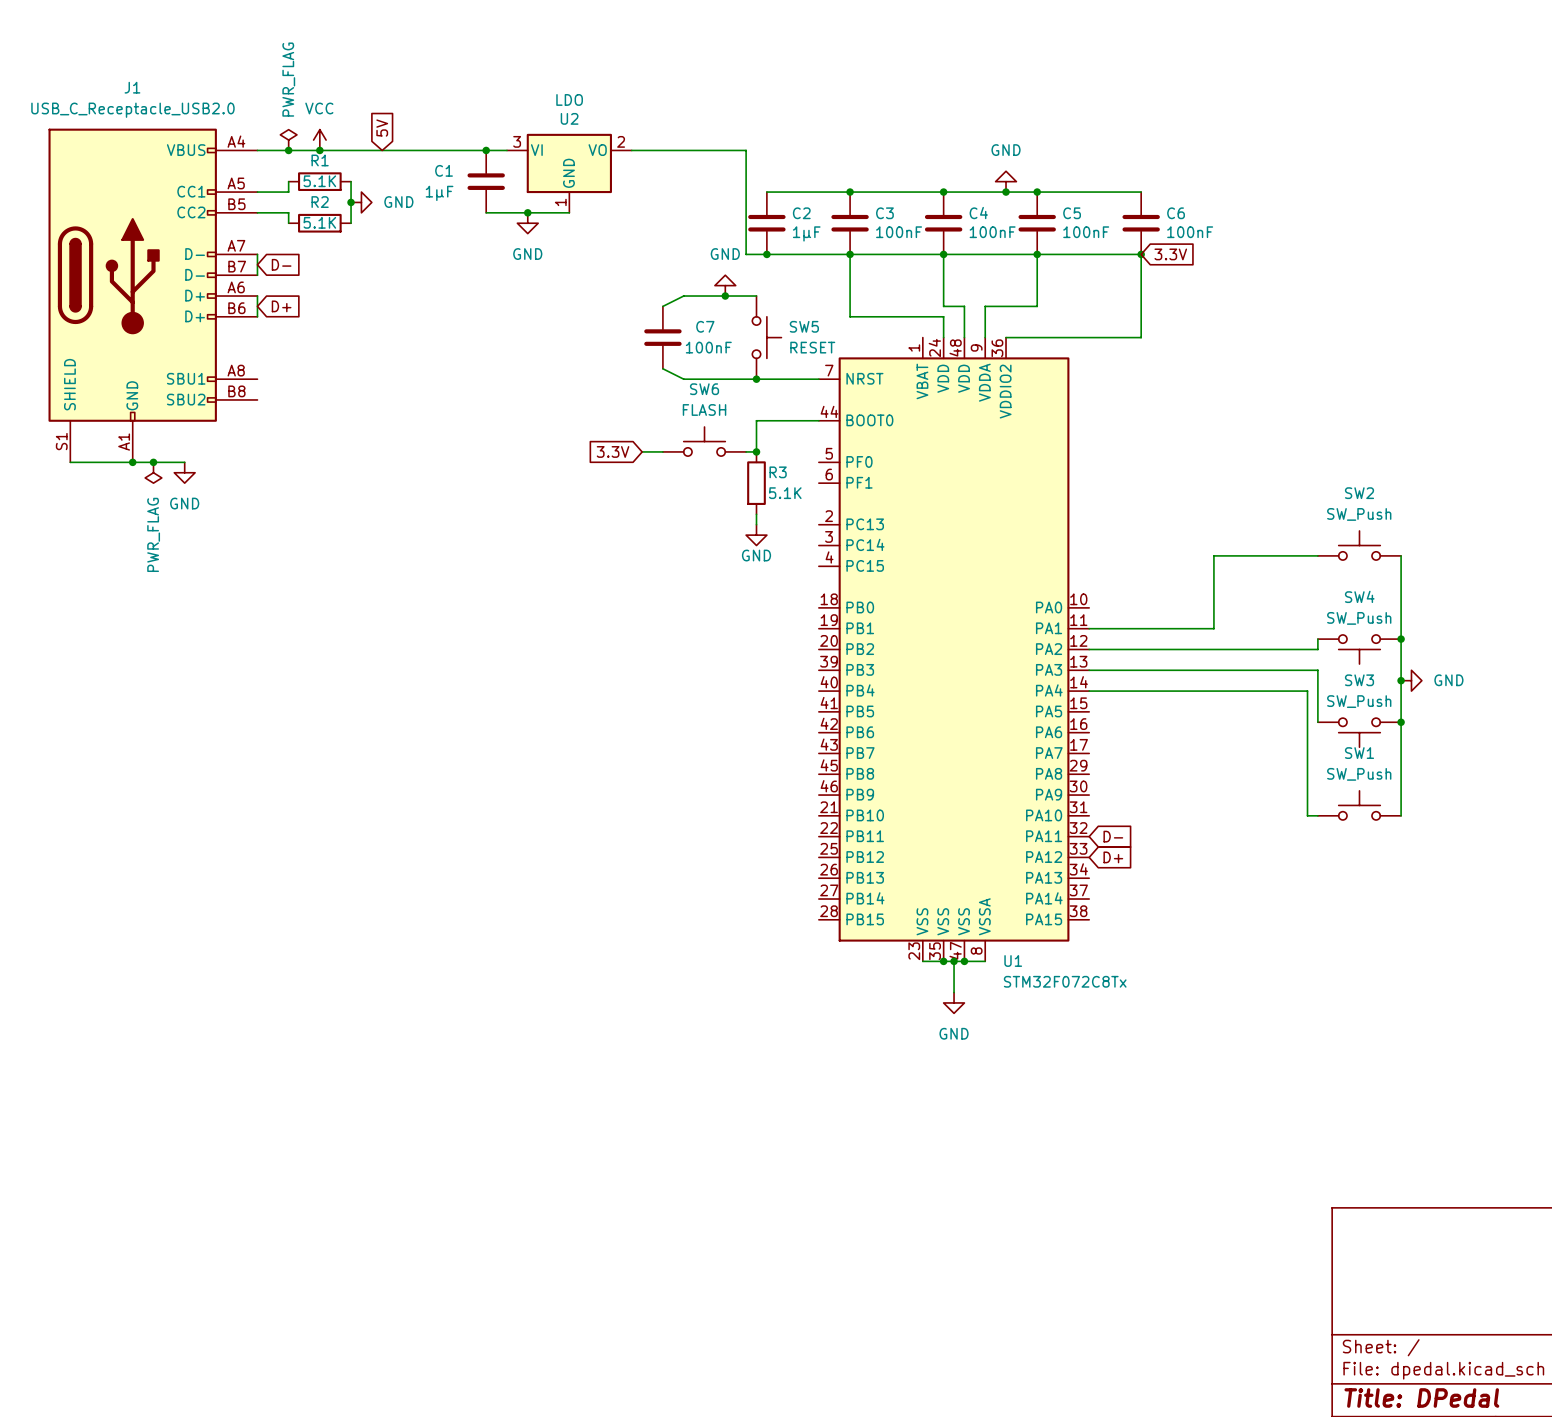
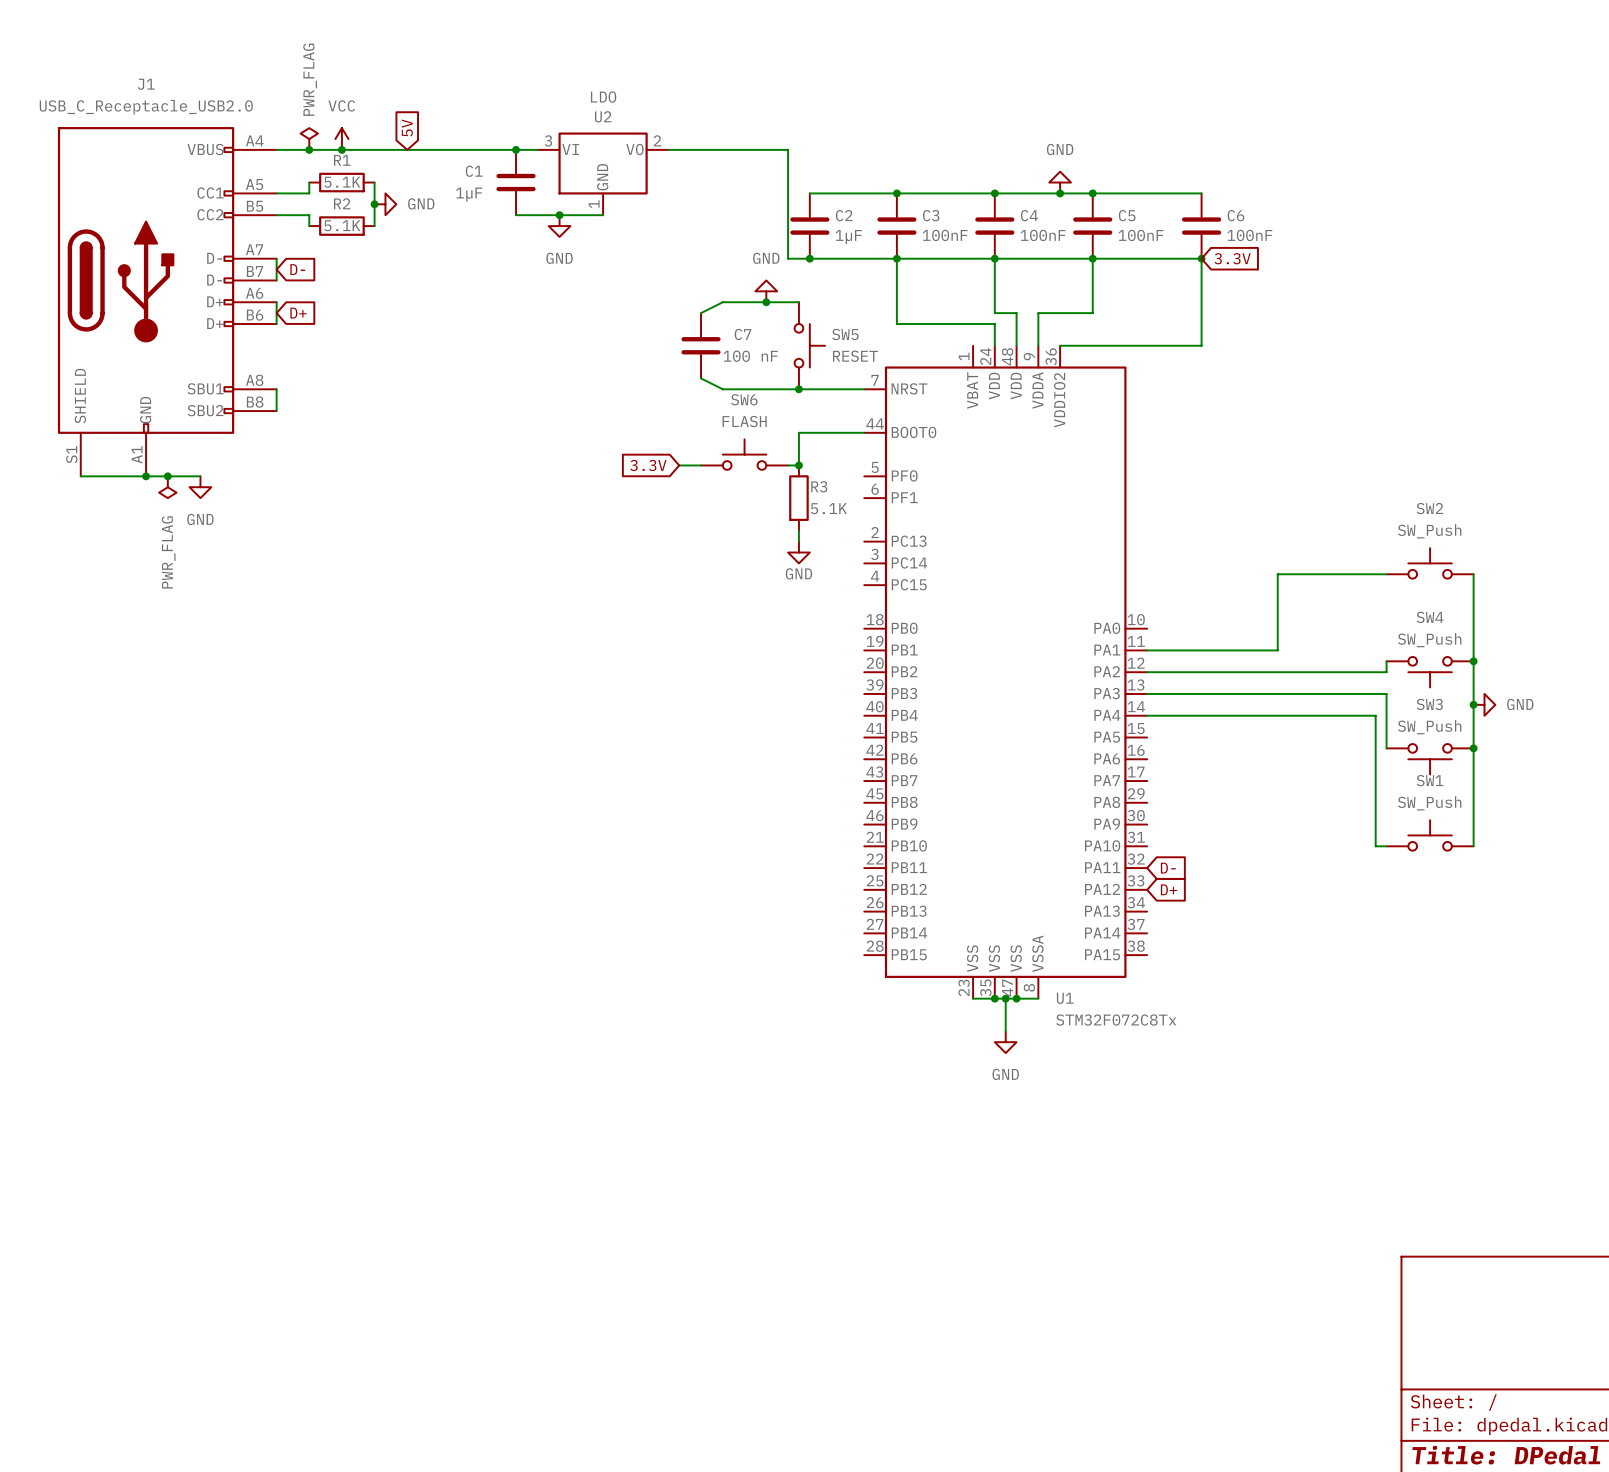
C7 value: 100nF (708, 347) -> 100 nF (750, 356)
wire: none -> (276, 389) (276, 411)

